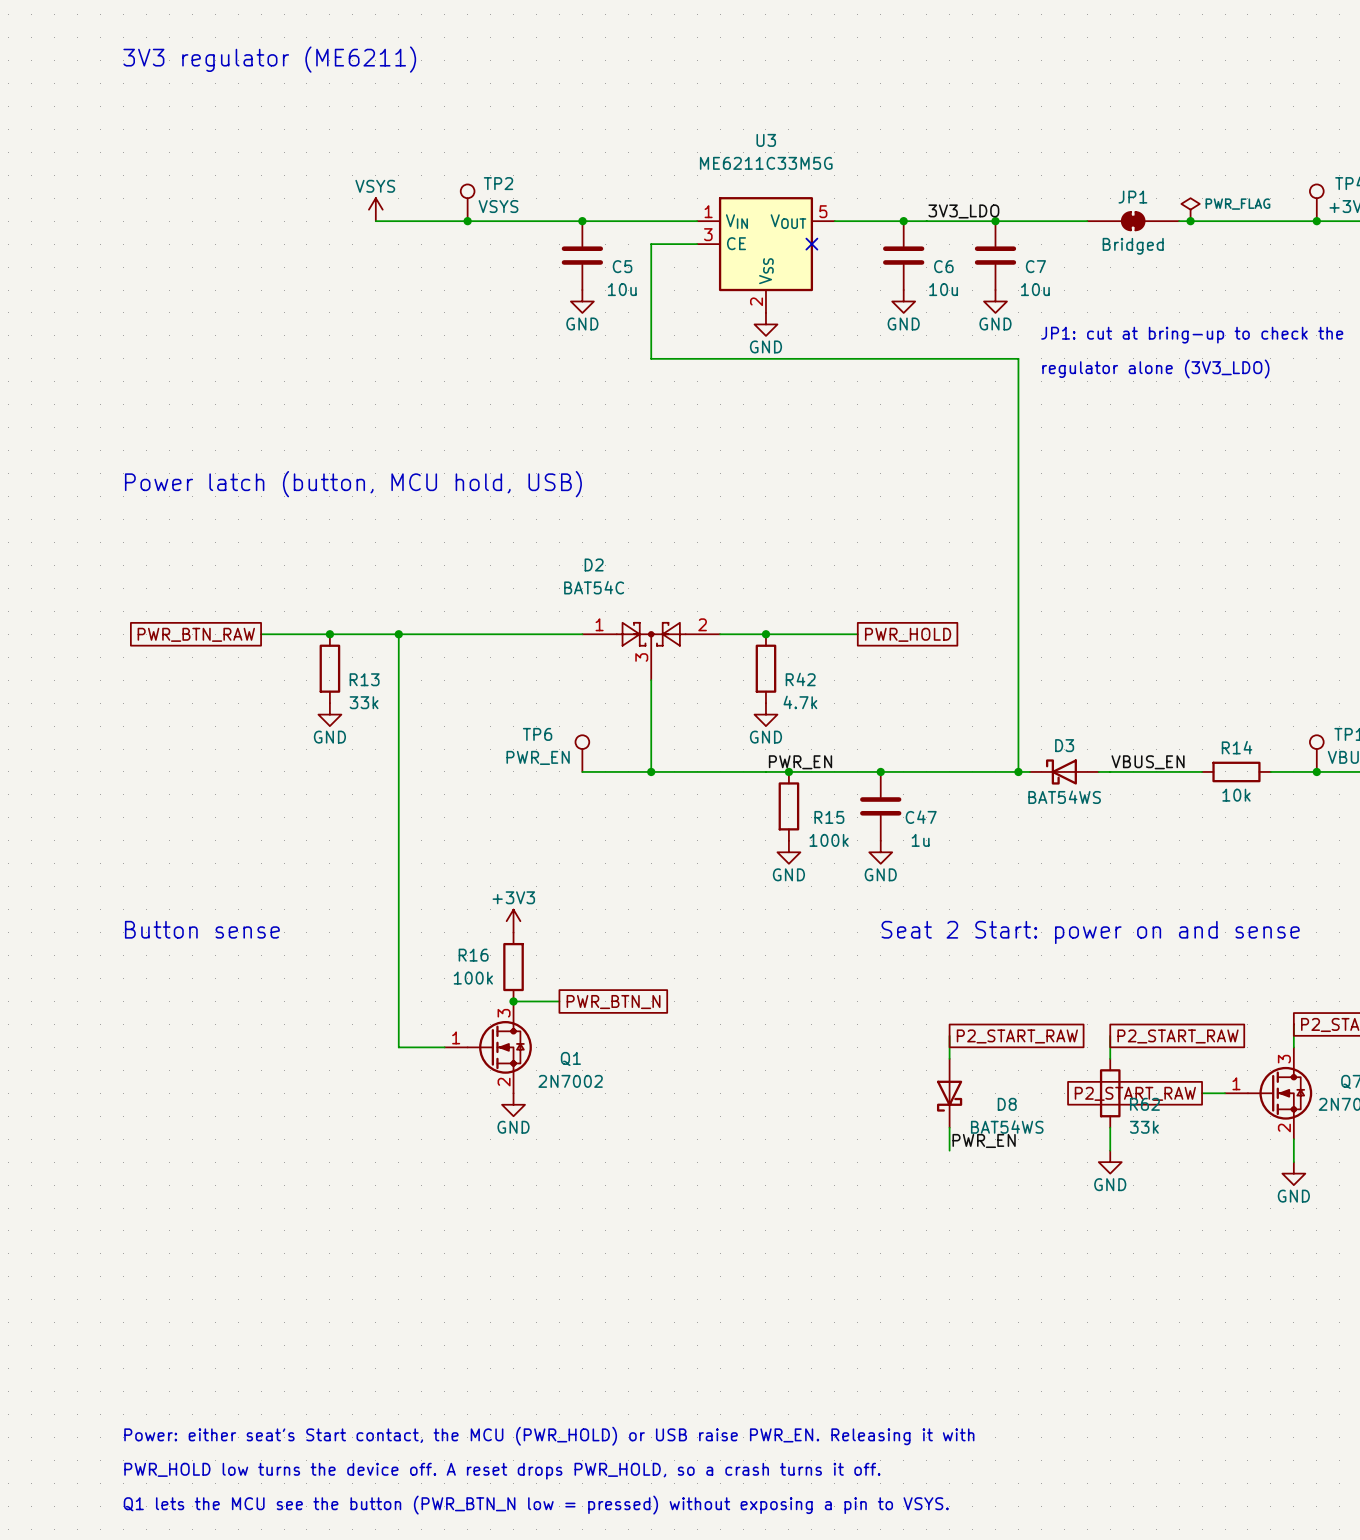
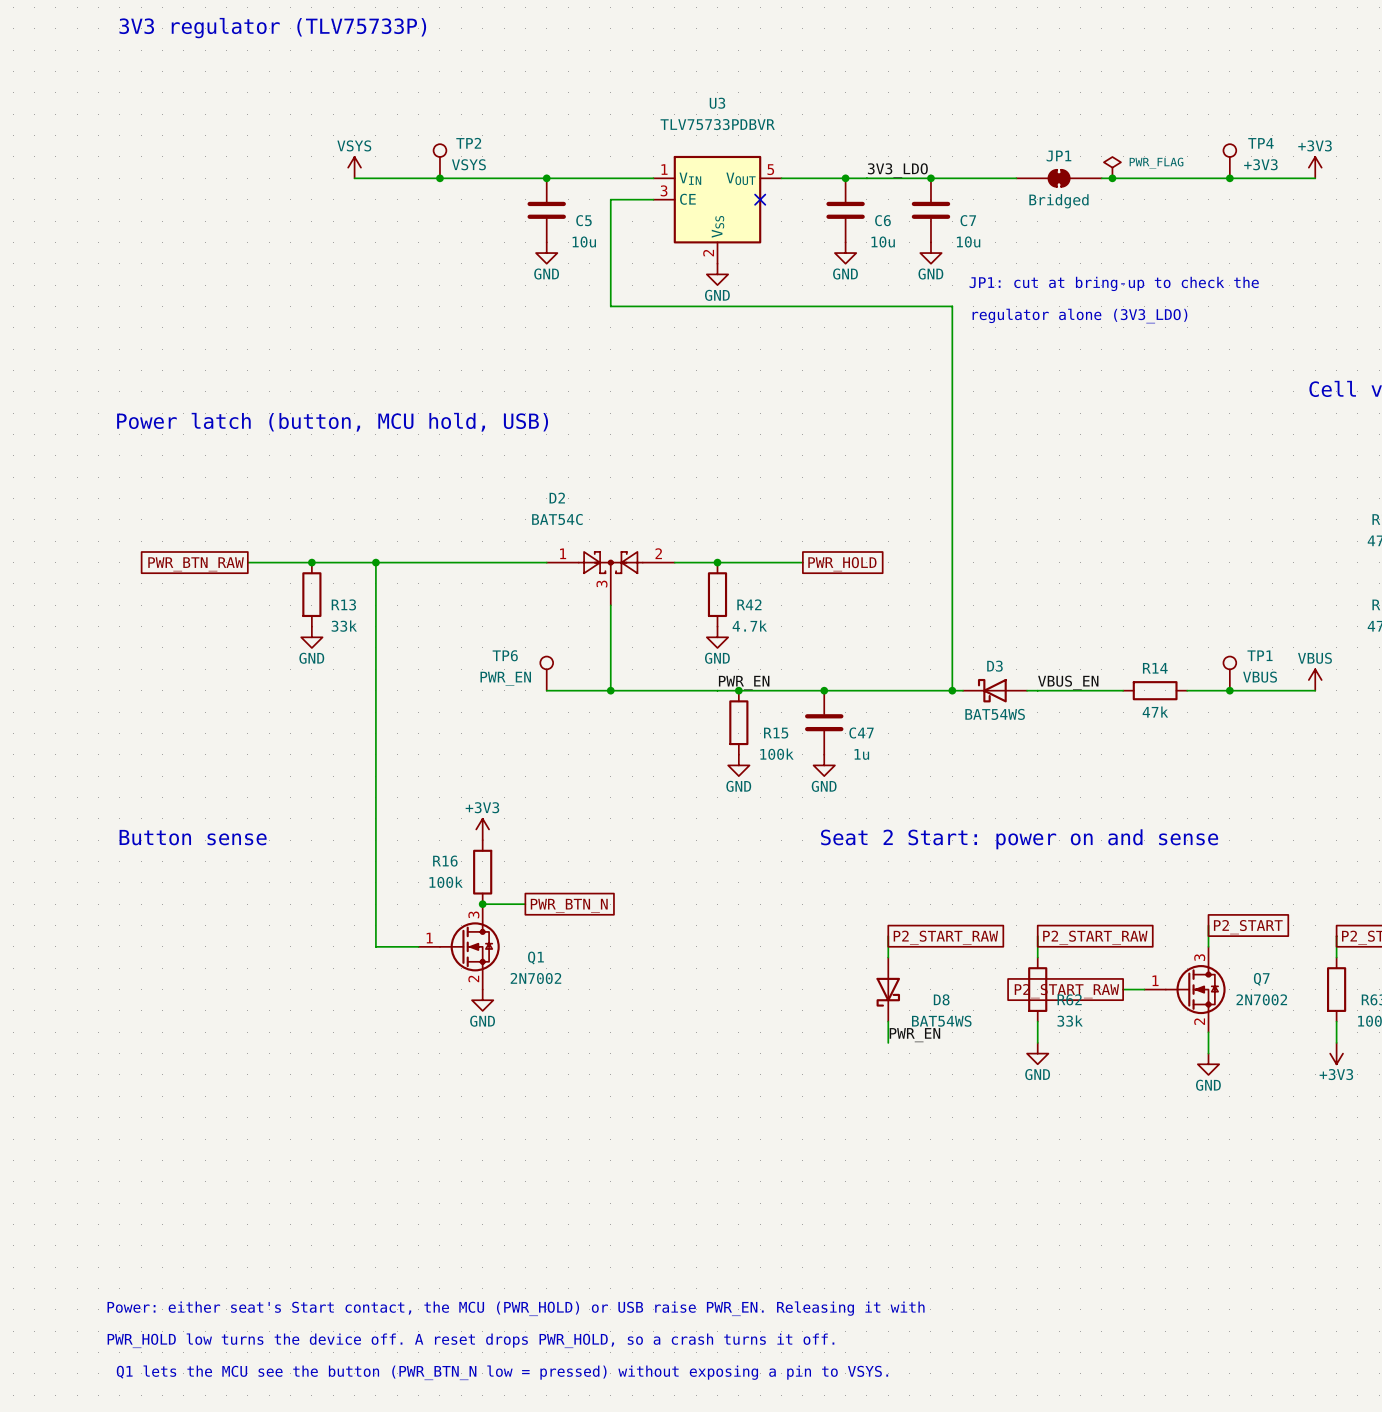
text: 3V3 regulator (ME6211) (269, 59) -> 3V3 regulator (TLV75733P) (272, 28)
U3 value: ME6211C33M5G (766, 163) -> TLV75733PDBVR (717, 124)
R14 value: 10k (1236, 795) -> 47k (1155, 712)

